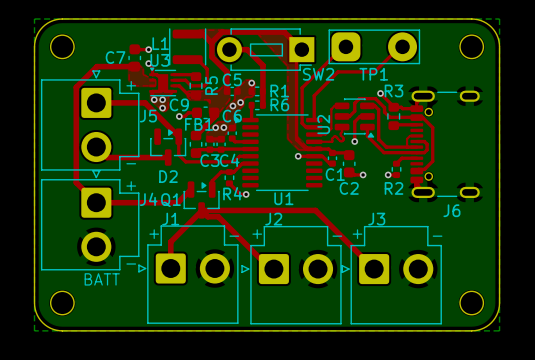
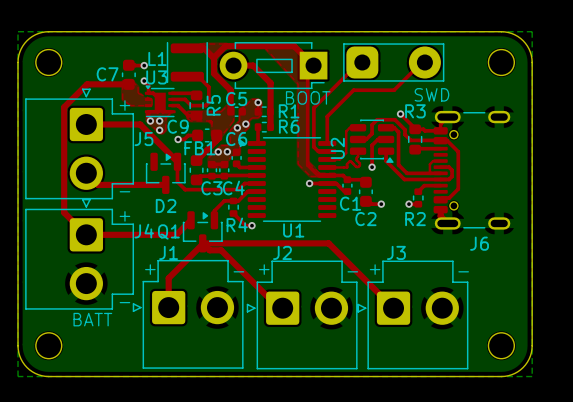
SW2 name: SW2 (318, 74) -> none
TP1 name: TP1 (373, 74) -> none
text: none -> SWD (431, 94)
text: none -> BOOT (308, 97)

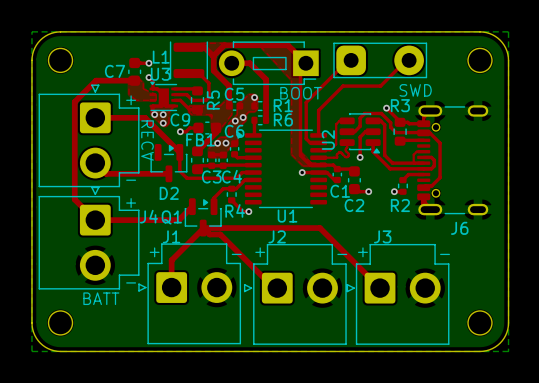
J5 name: J5 (143, 139) -> none
text: none -> RECV (147, 140)

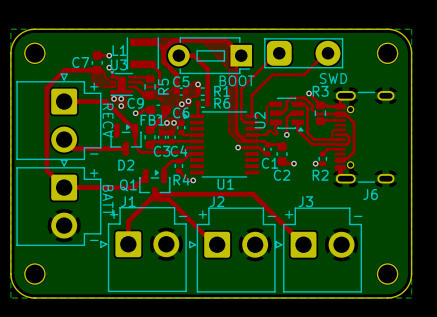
J4 name: J4 (148, 216) -> none
text rotation: 0° (101, 298) -> 90° clockwise (108, 200)
text position: BATT (101, 298) -> BATT (108, 200)

